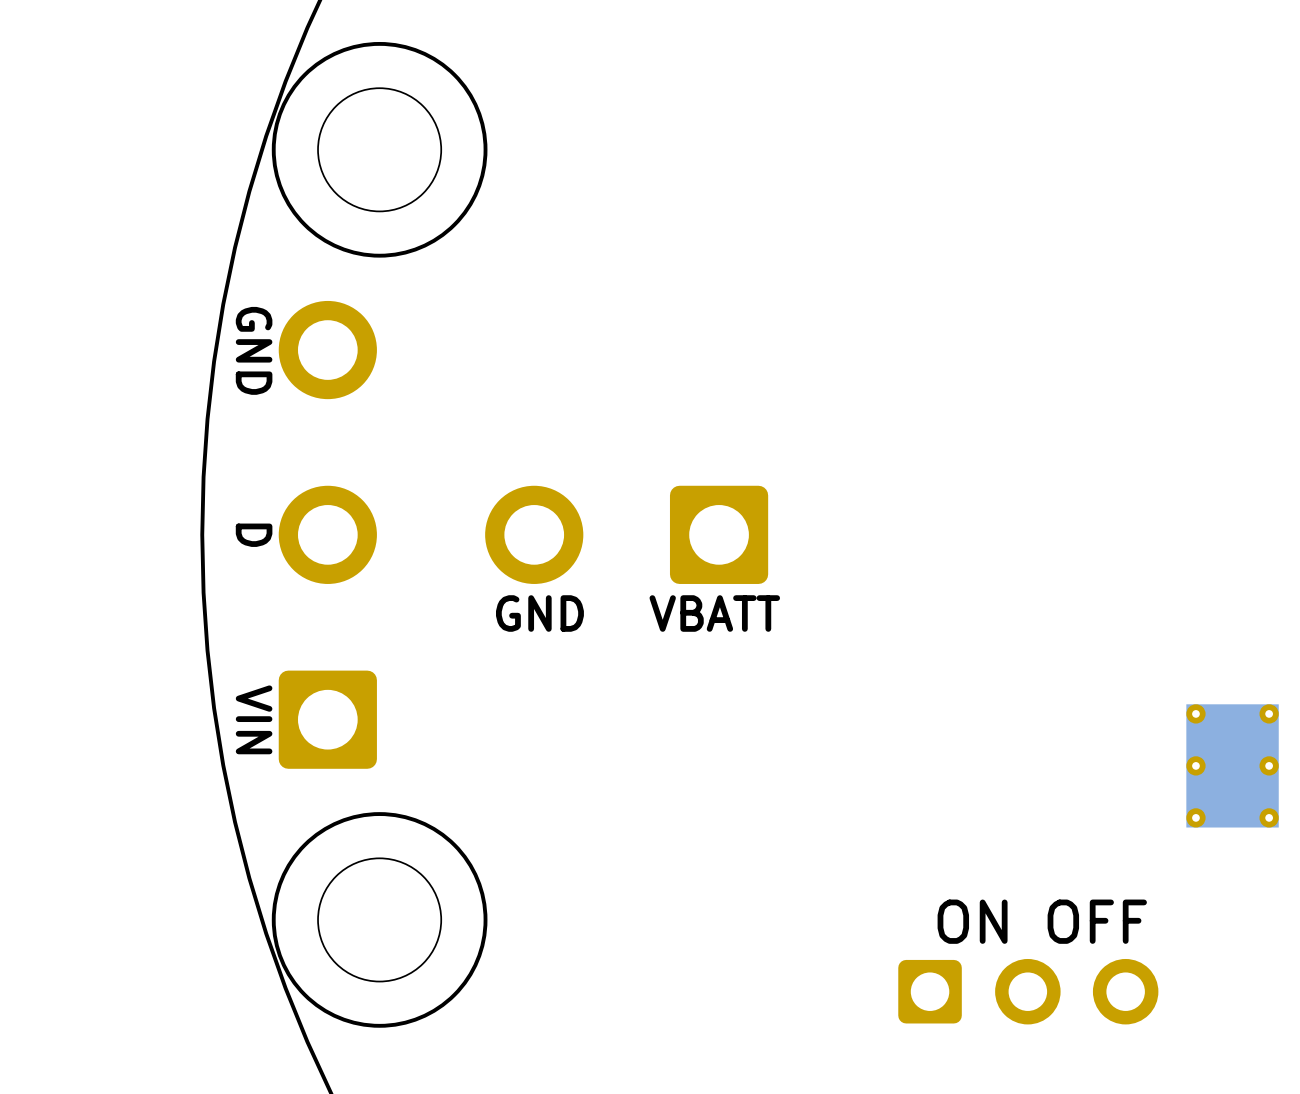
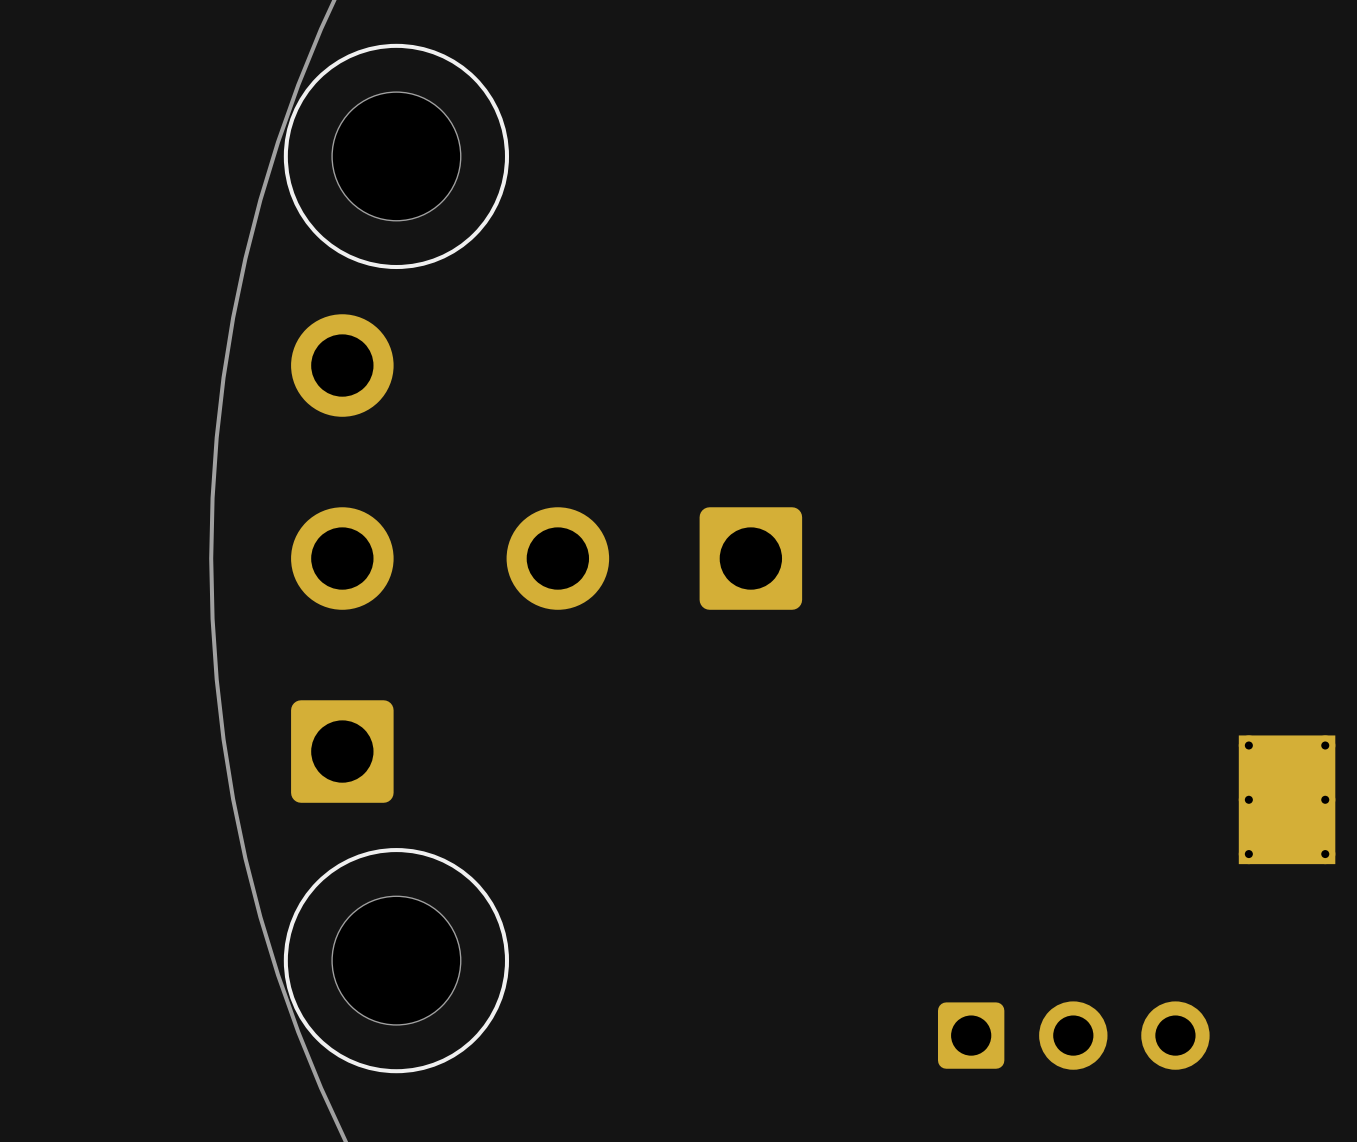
text: GND (254, 350) -> none
text: D (254, 535) -> none
text: GND (539, 613) -> none
text: VBATT (714, 613) -> none
text: VIN (254, 719) -> none
text: ON OFF (1042, 921) -> none

